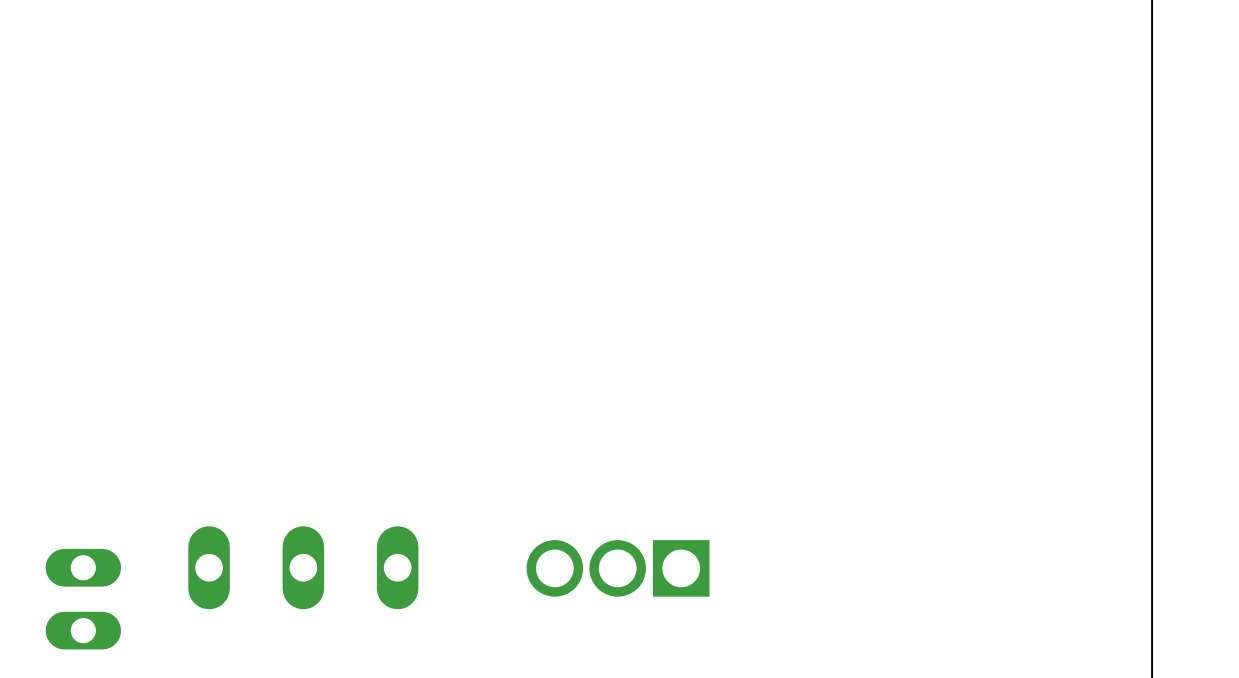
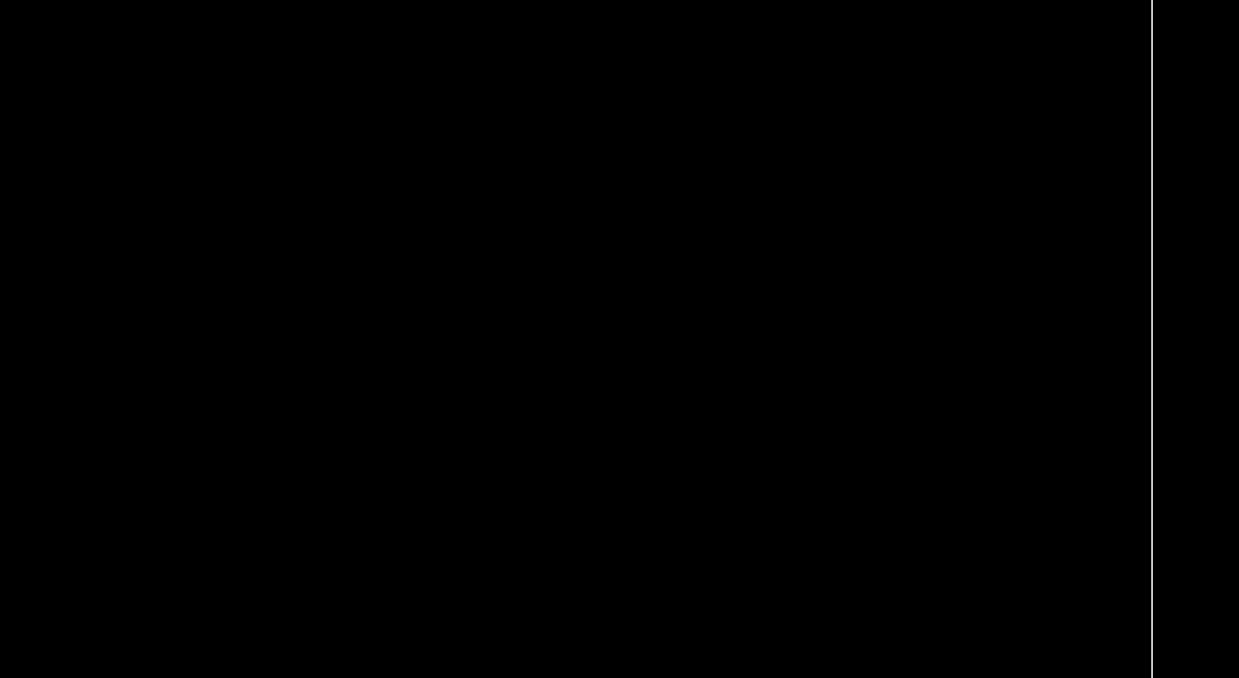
part: (303, 567) -> none
part: (618, 568) -> none
part: (83, 599) -> none

